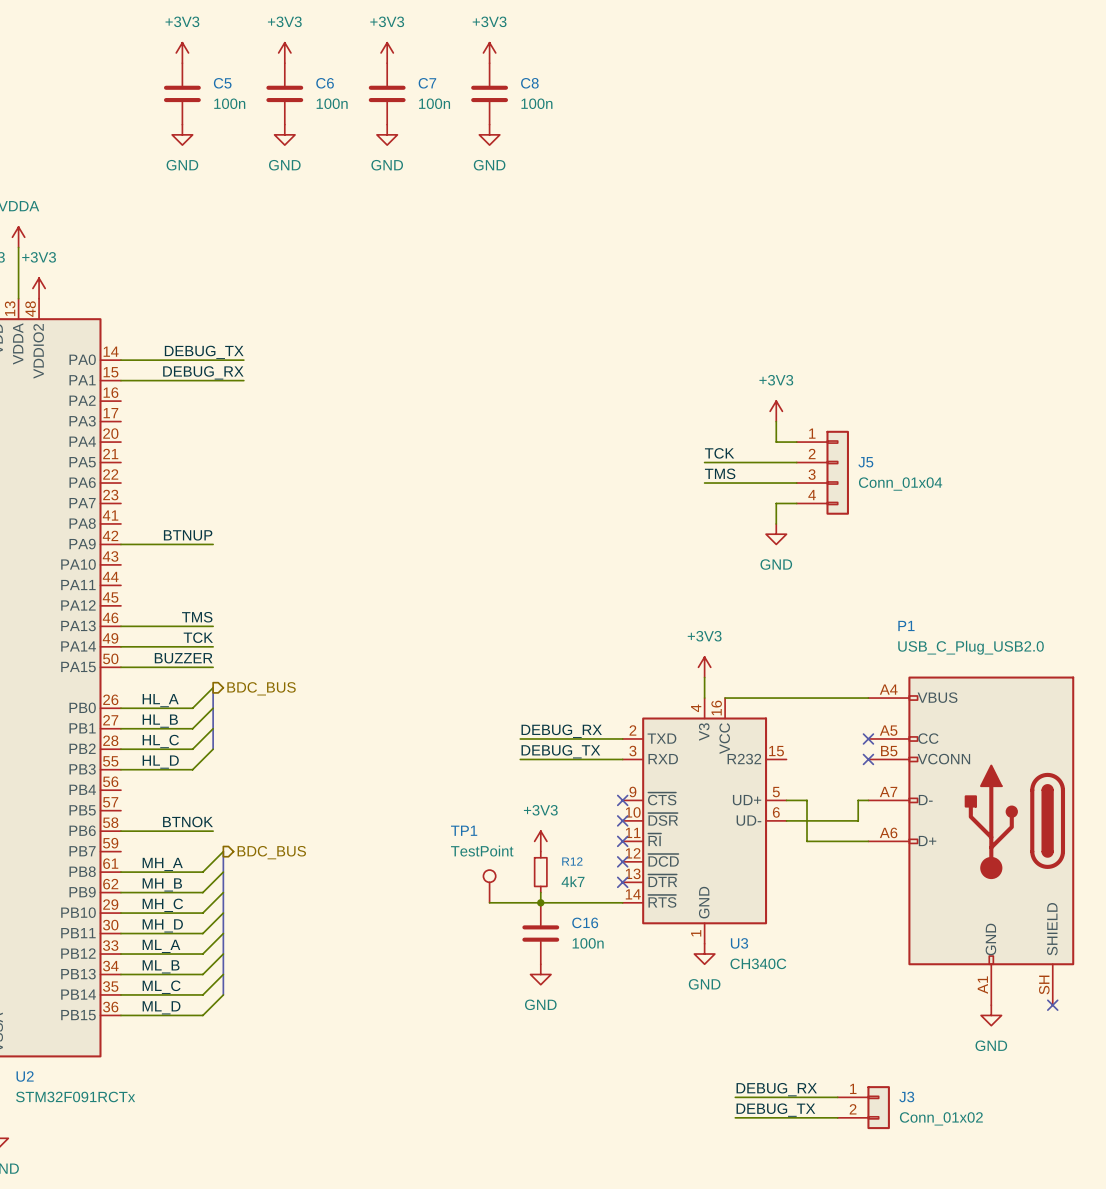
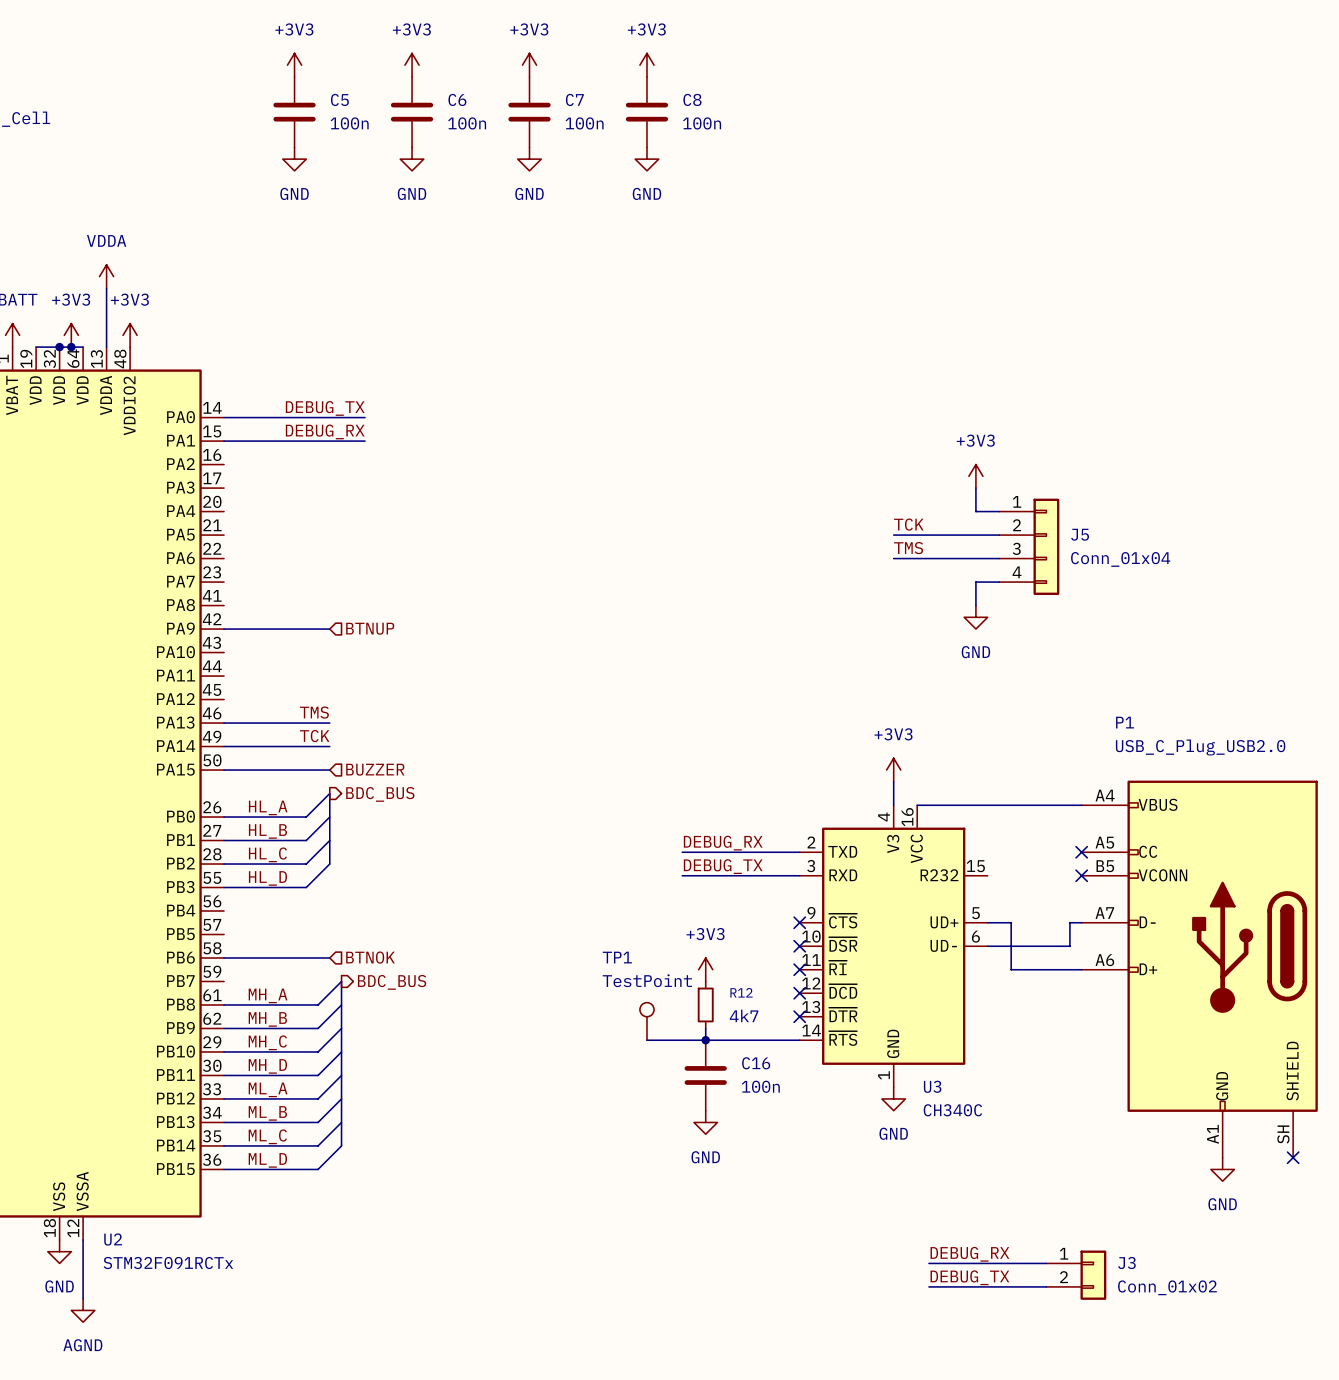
label: BTNUP (188, 535) -> none
hierarchical label: none -> BTNUP (370, 628)
label: BUZZER (183, 658) -> none
hierarchical label: none -> BUZZER (375, 769)
label: BTNOK (188, 822) -> none
hierarchical label: none -> BTNOK (370, 957)

